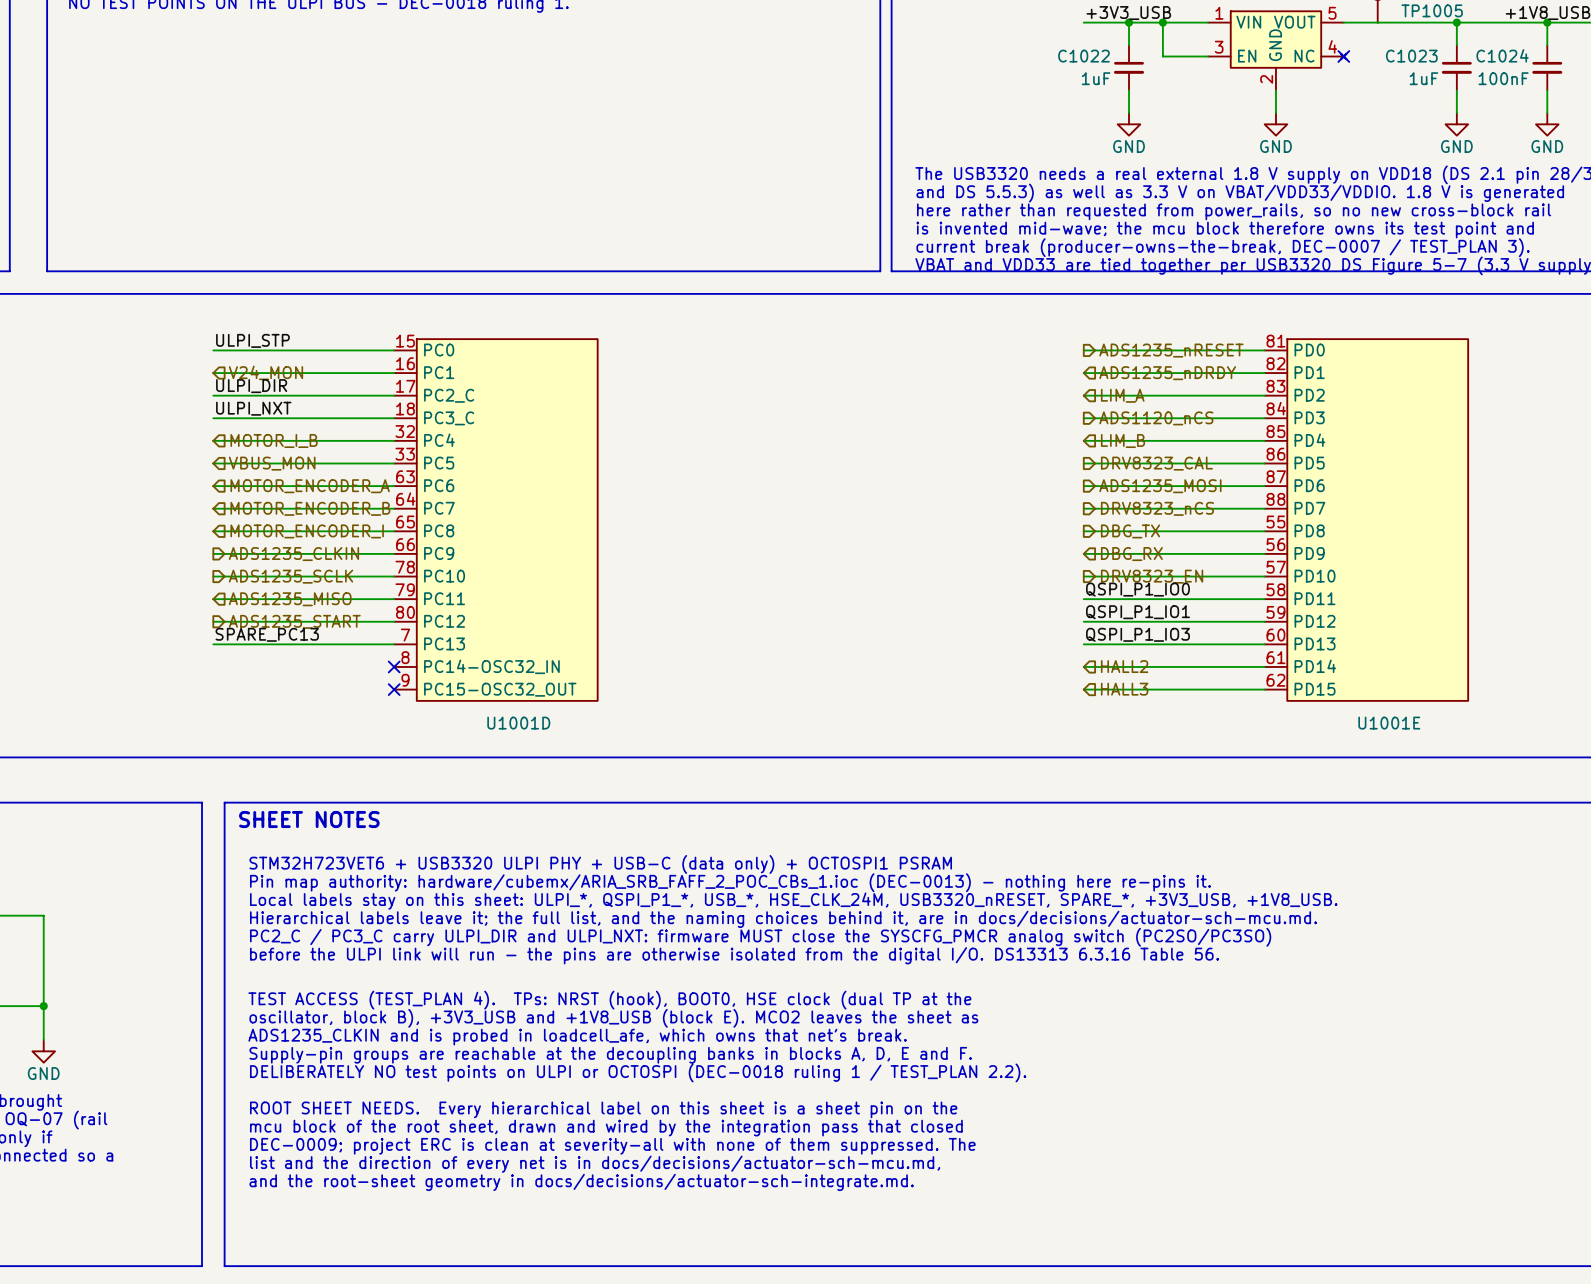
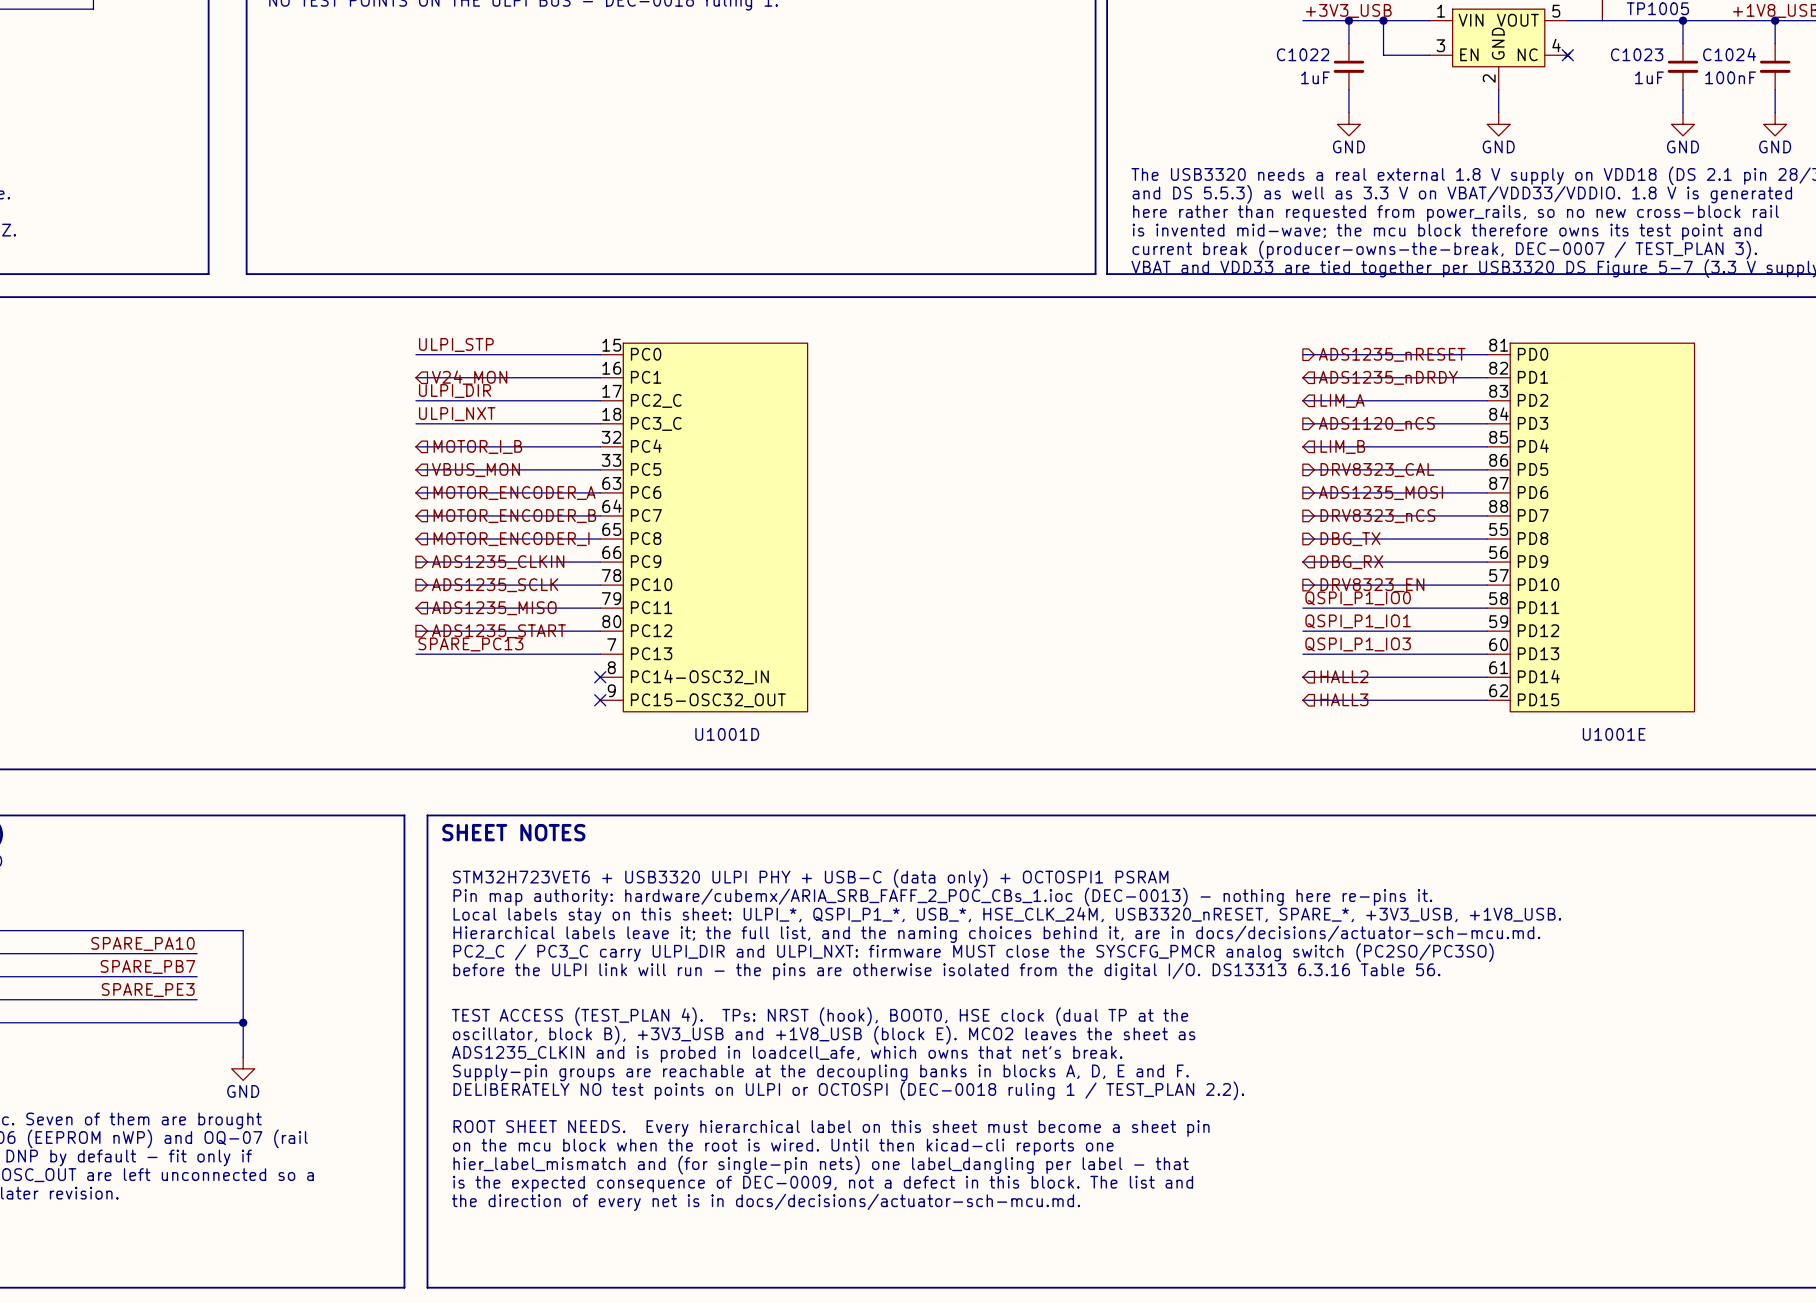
text: ROOT SHEET NEEDS. Every hierarchical label on this sheet is a sheet pin on the (603, 1109) -> ROOT SHEET NEEDS. Every hierarchical label on this sheet must become a sheet pin (831, 1128)
text: mcu block of the root sheet, drawn and wired by the integration pass that closed (606, 1128) -> on the mcu block when the root is wired. Until then kicad-cli reports one (783, 1147)
text: DEC-0009; project ERC is clean at severity-all with none of them suppressed. The (612, 1146) -> hier_label_mismatch and (for single-pin nets) one label_dangling per label - that (821, 1165)
text: list and the direction of every net is in docs/decisions/actuator-sch-mcu.md, (595, 1164) -> is the expected consequence of DEC-0009, not a defect in this block. The list and (823, 1184)
text: and the root-sheet geometry in docs/decisions/actuator-sch-integrate.md. (581, 1182) -> the direction of every net is in docs/decisions/actuator-sch-mcu.md. (765, 1202)

